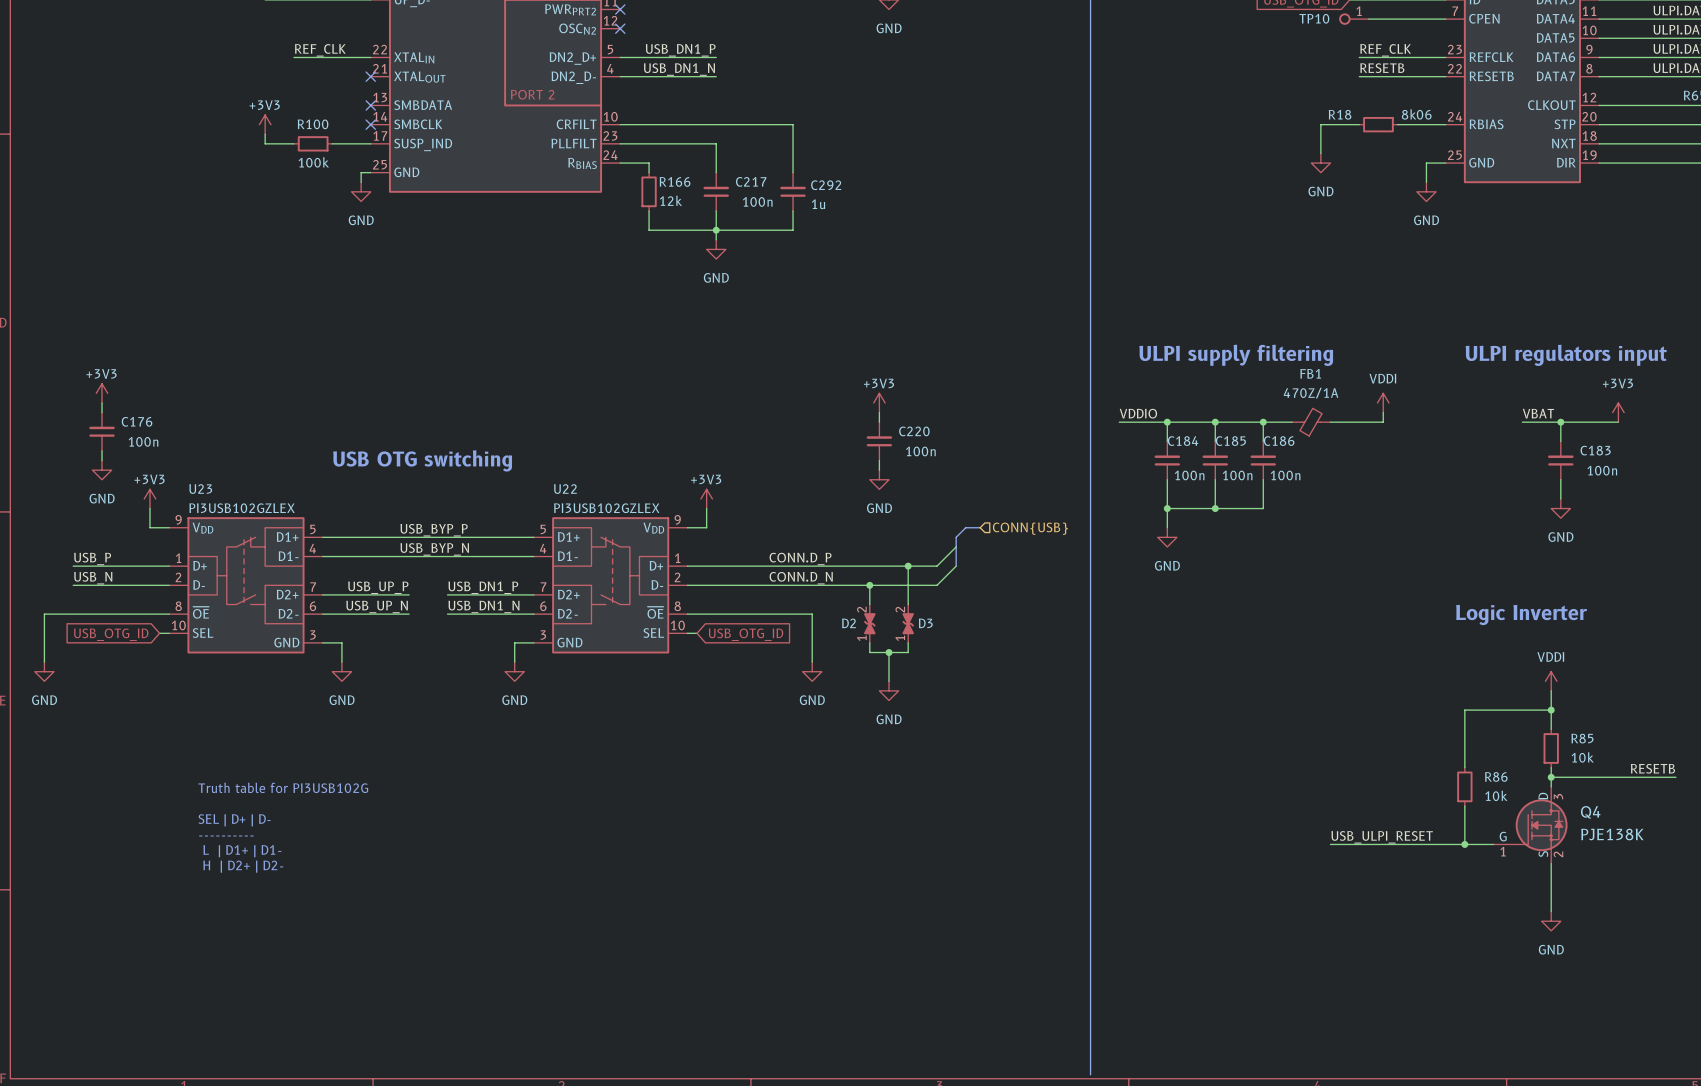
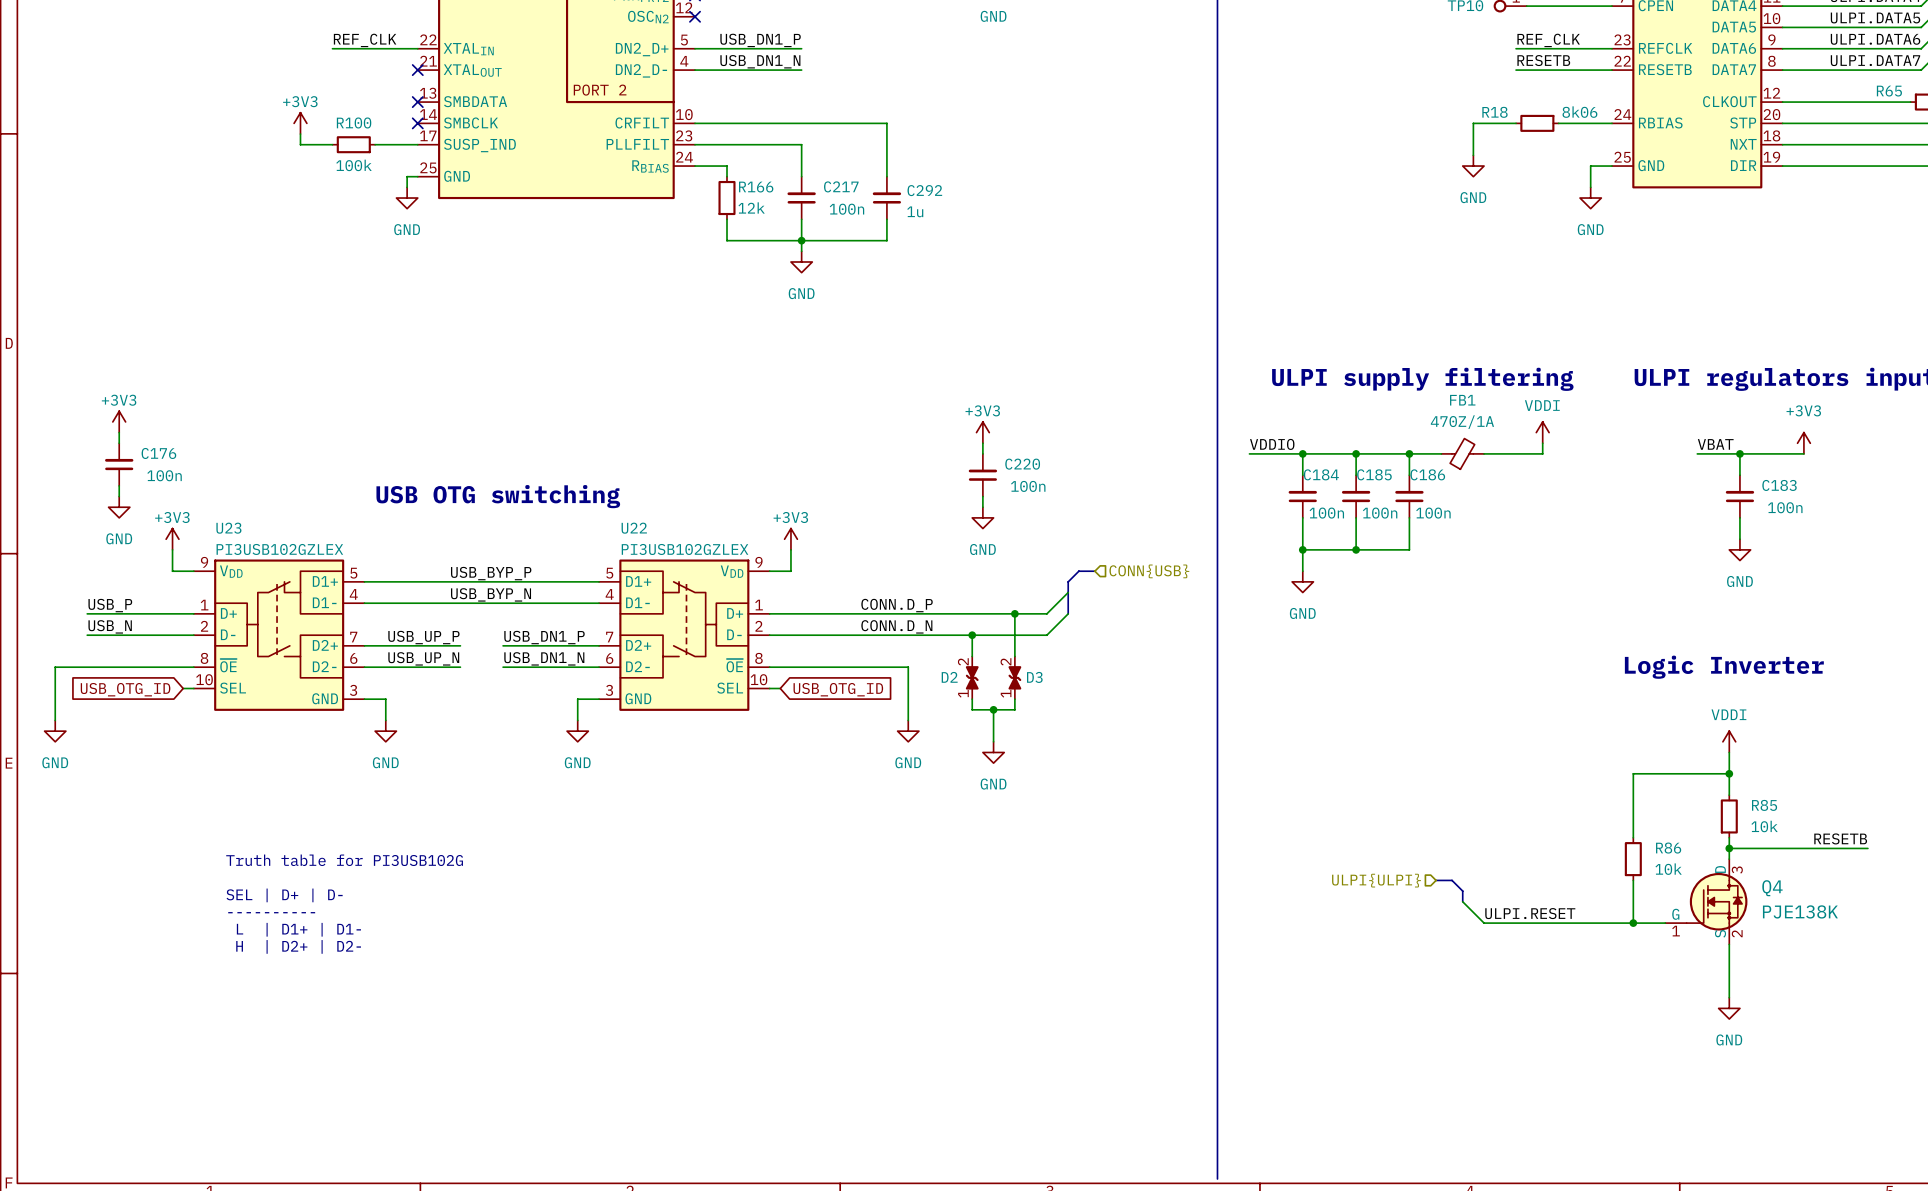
bus: none -> (1436, 880) (1452, 880) (1462, 891) (1462, 901)
hierarchical label: none -> ULPI{ULPI} (1376, 880)
wire: none -> (1462, 901) (1484, 923)
label: USB_ULPI_RESET (1382, 837) -> ULPI.RESET (1530, 913)

